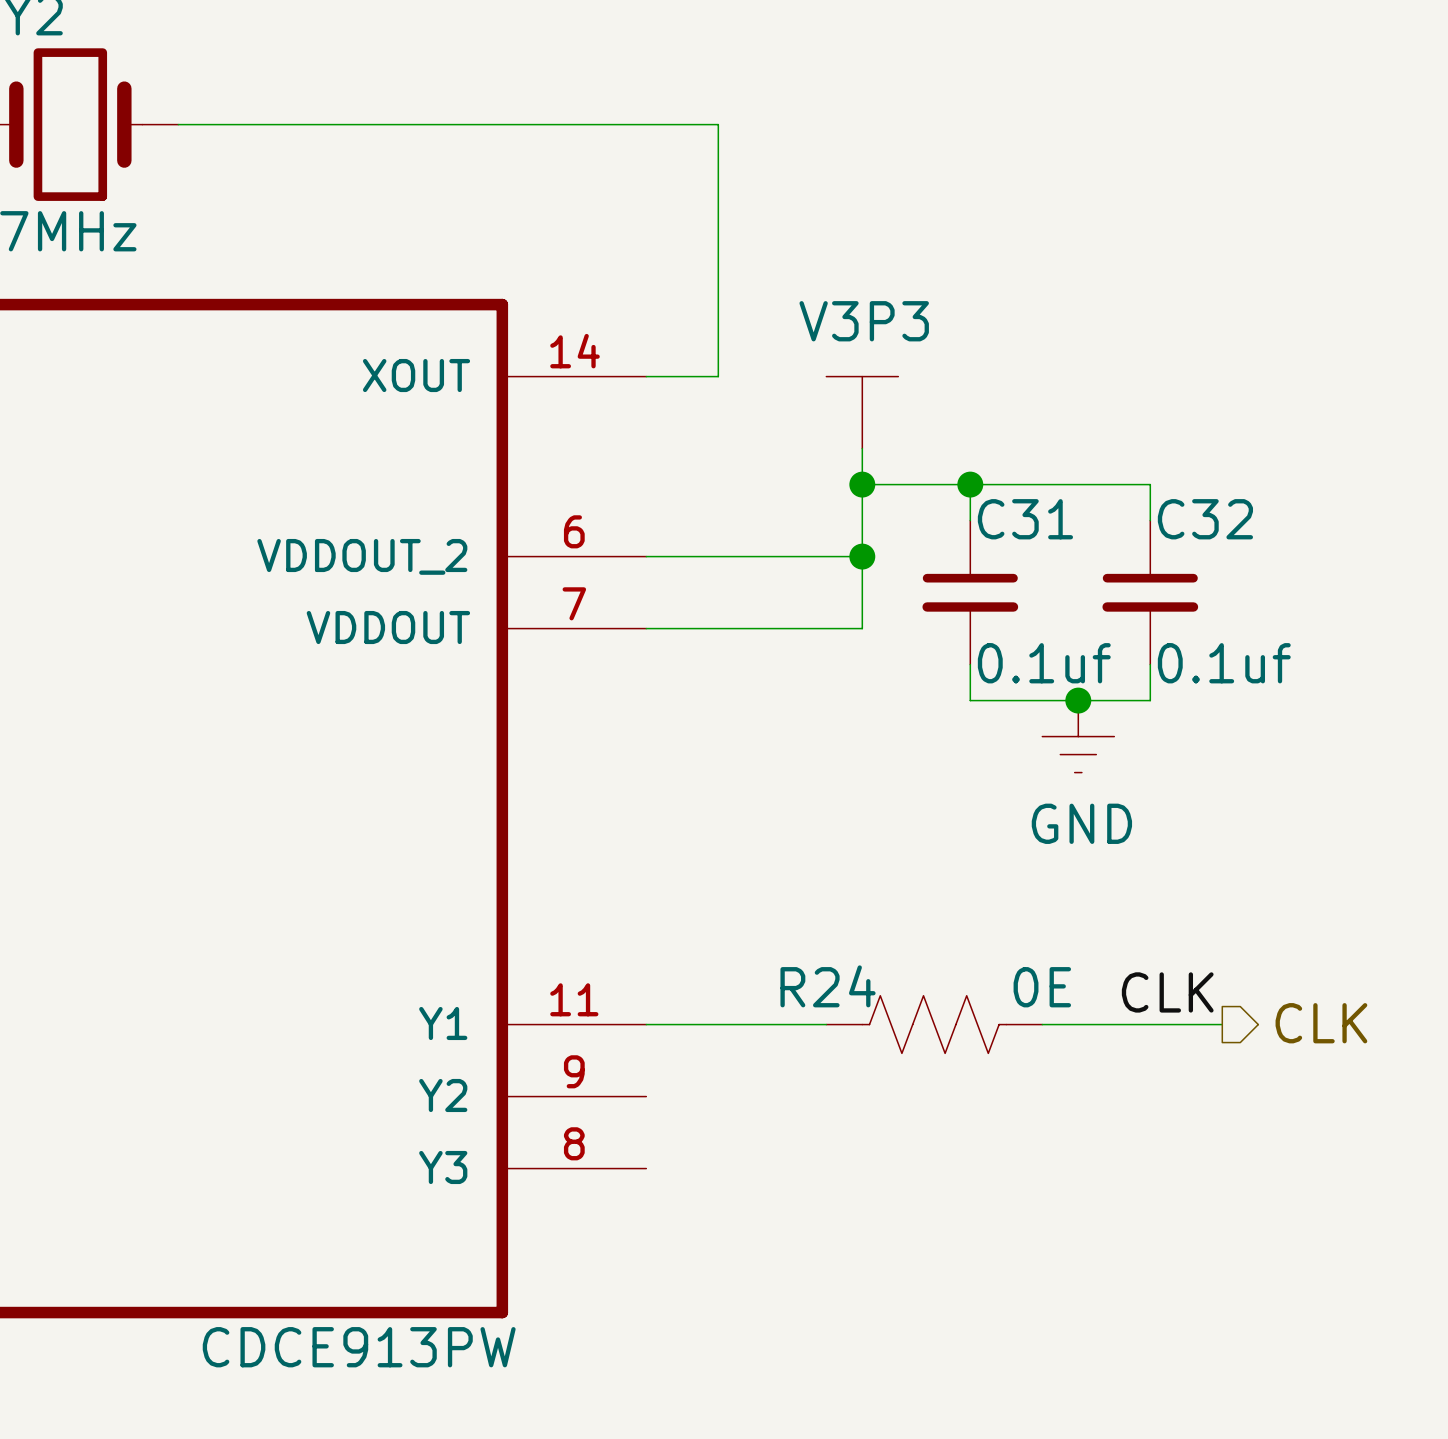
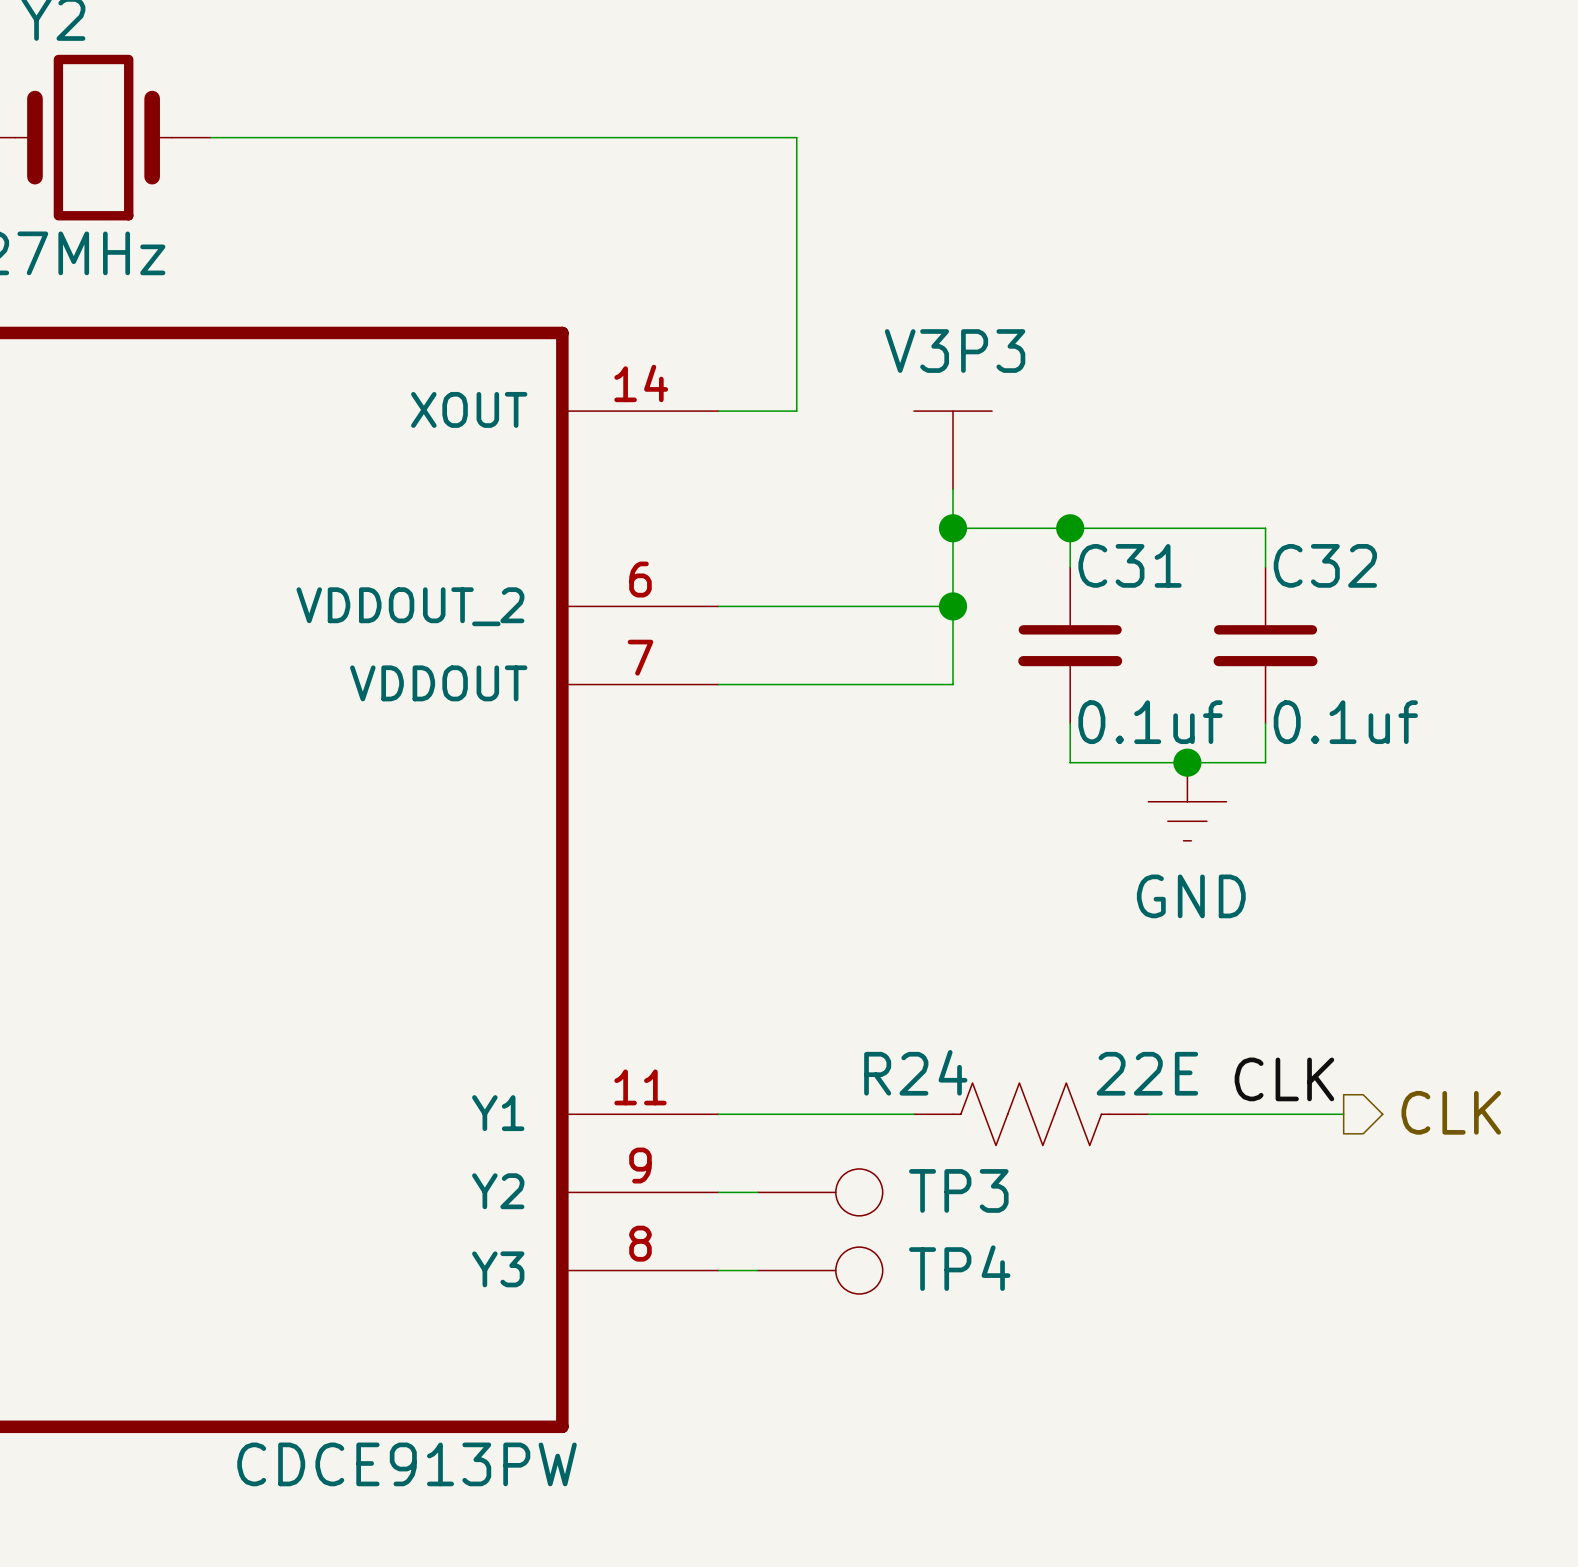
R24 value: 0E (1042, 987) -> 22E (1147, 1073)
wire: none -> (718, 1192) (757, 1192)
TP3: none -> (820, 1192)
wire: none -> (718, 1270) (757, 1270)
TP4: none -> (820, 1270)

